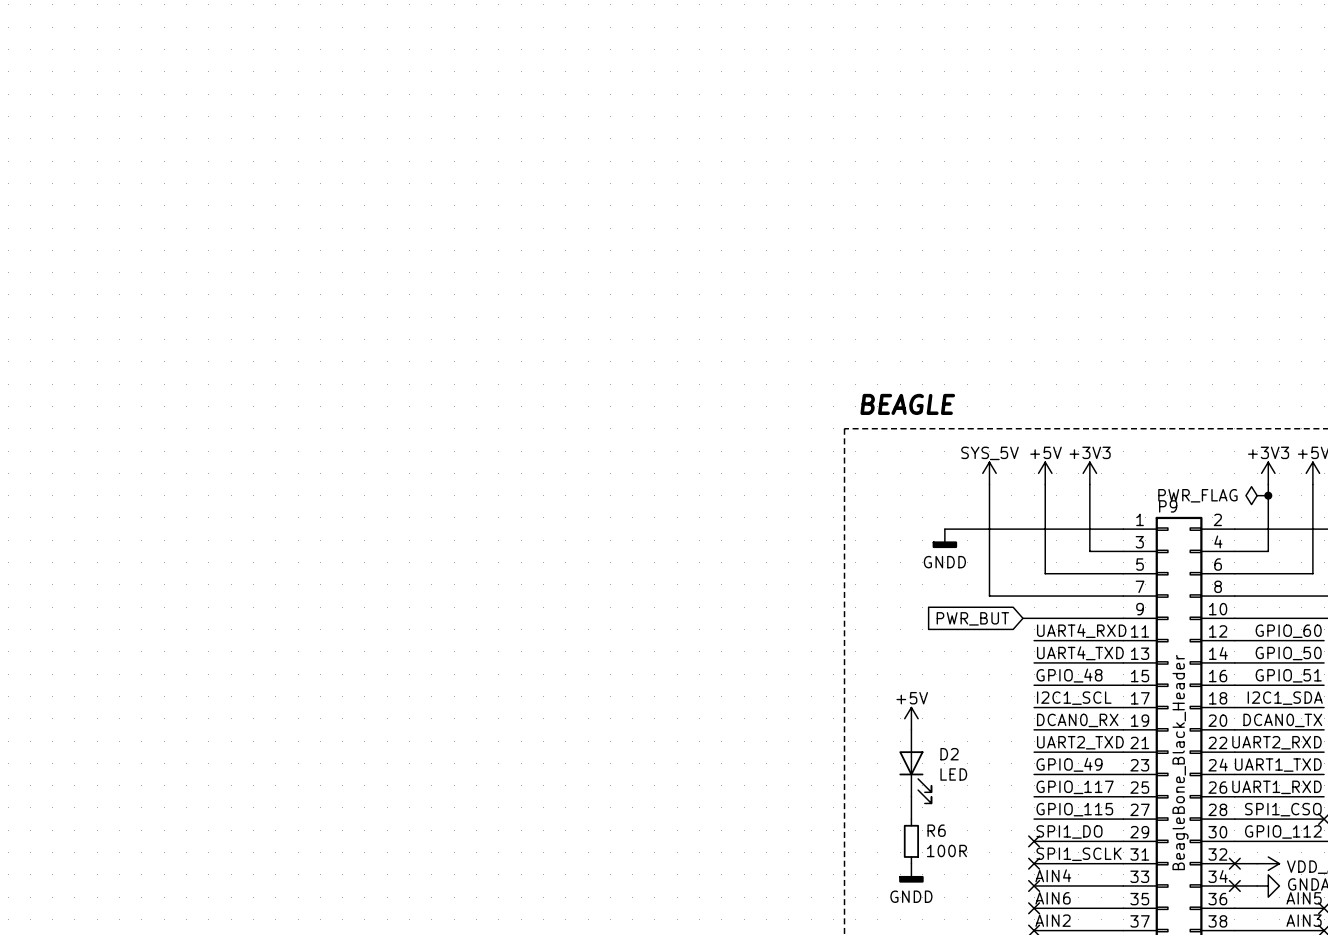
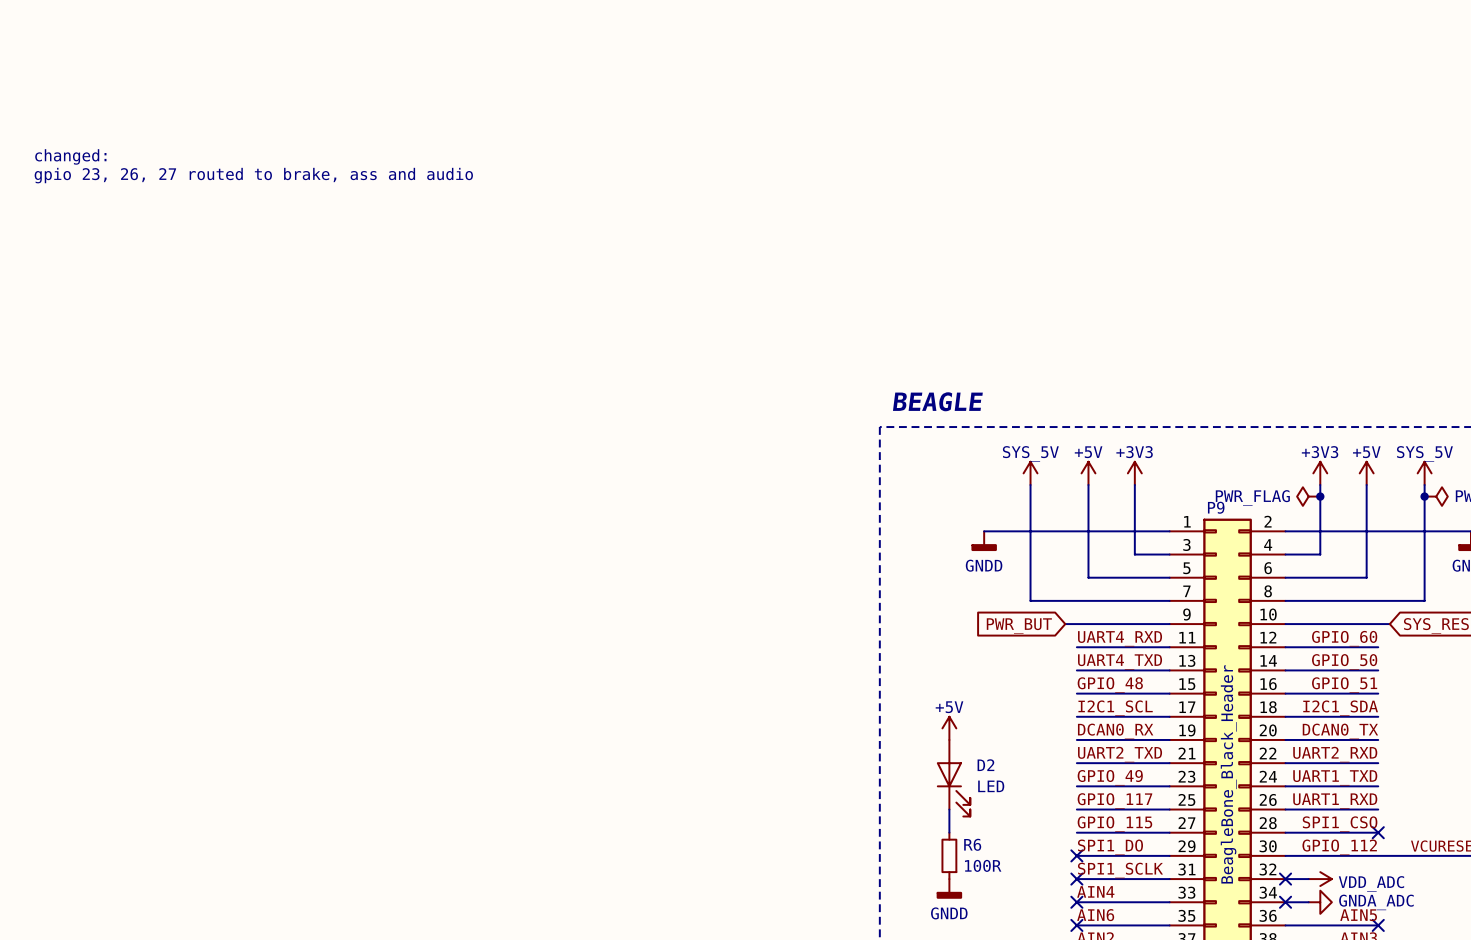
text: none -> changed: (70, 156)
text: none -> gpio 23, 26, 27 routed to brake, ass and audio (253, 175)

